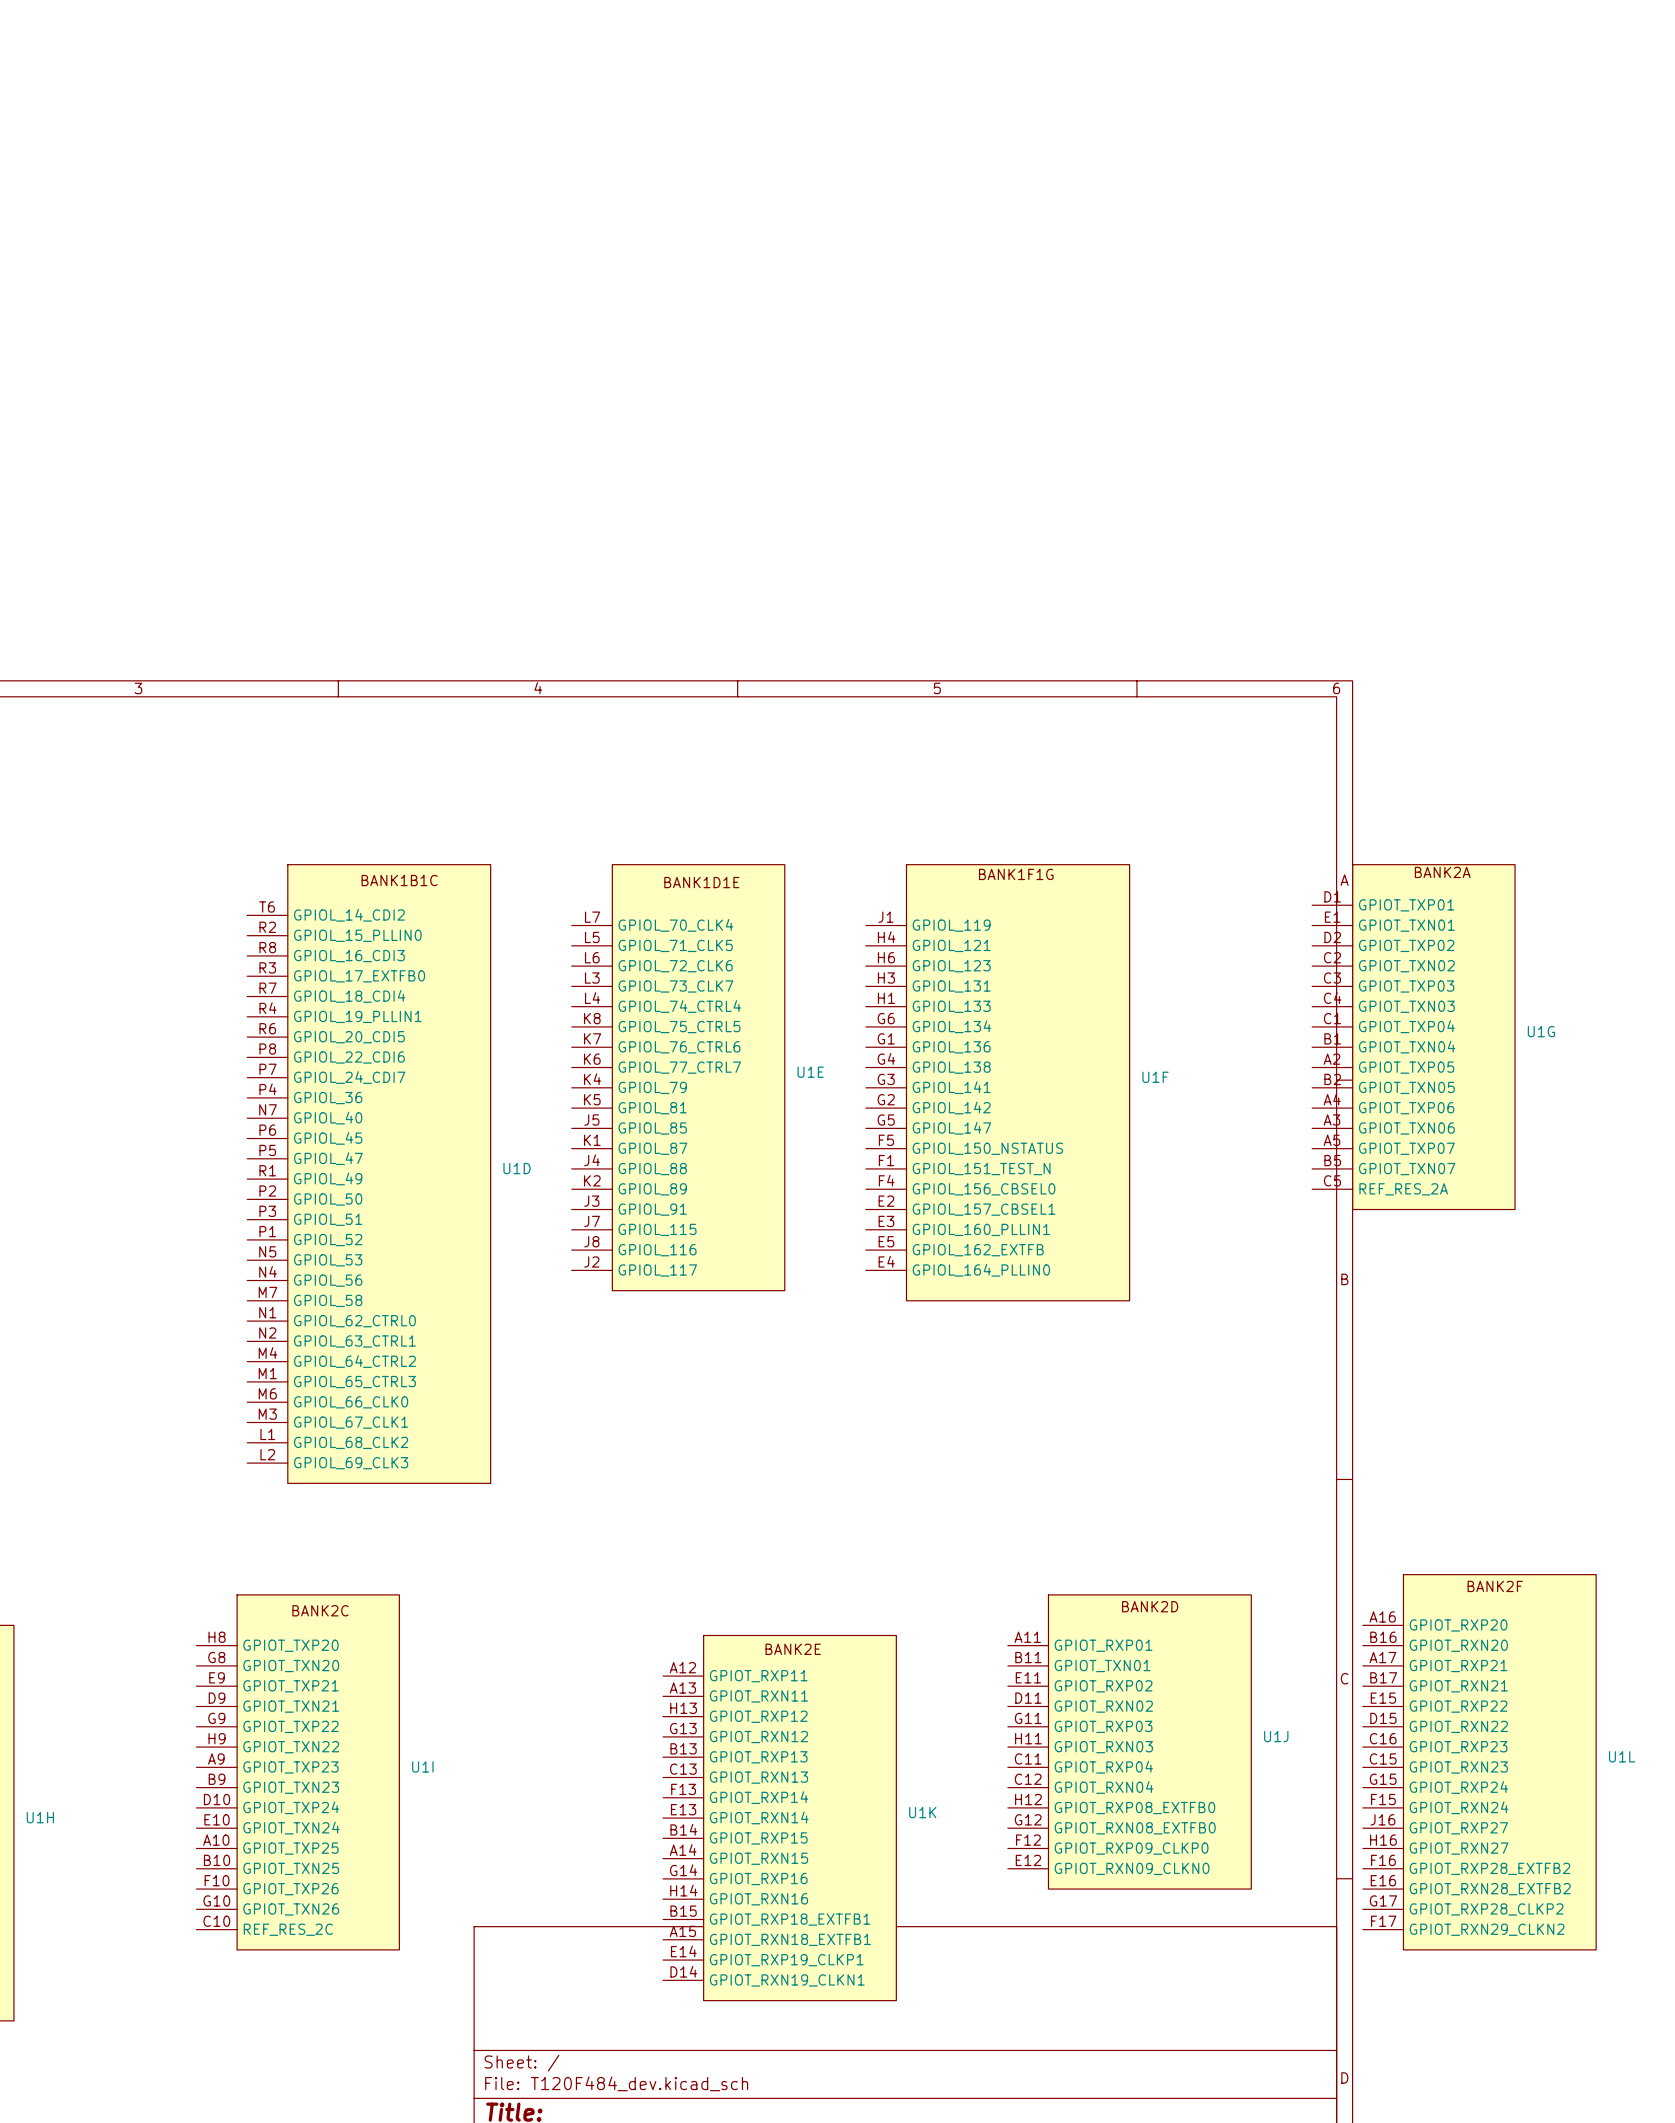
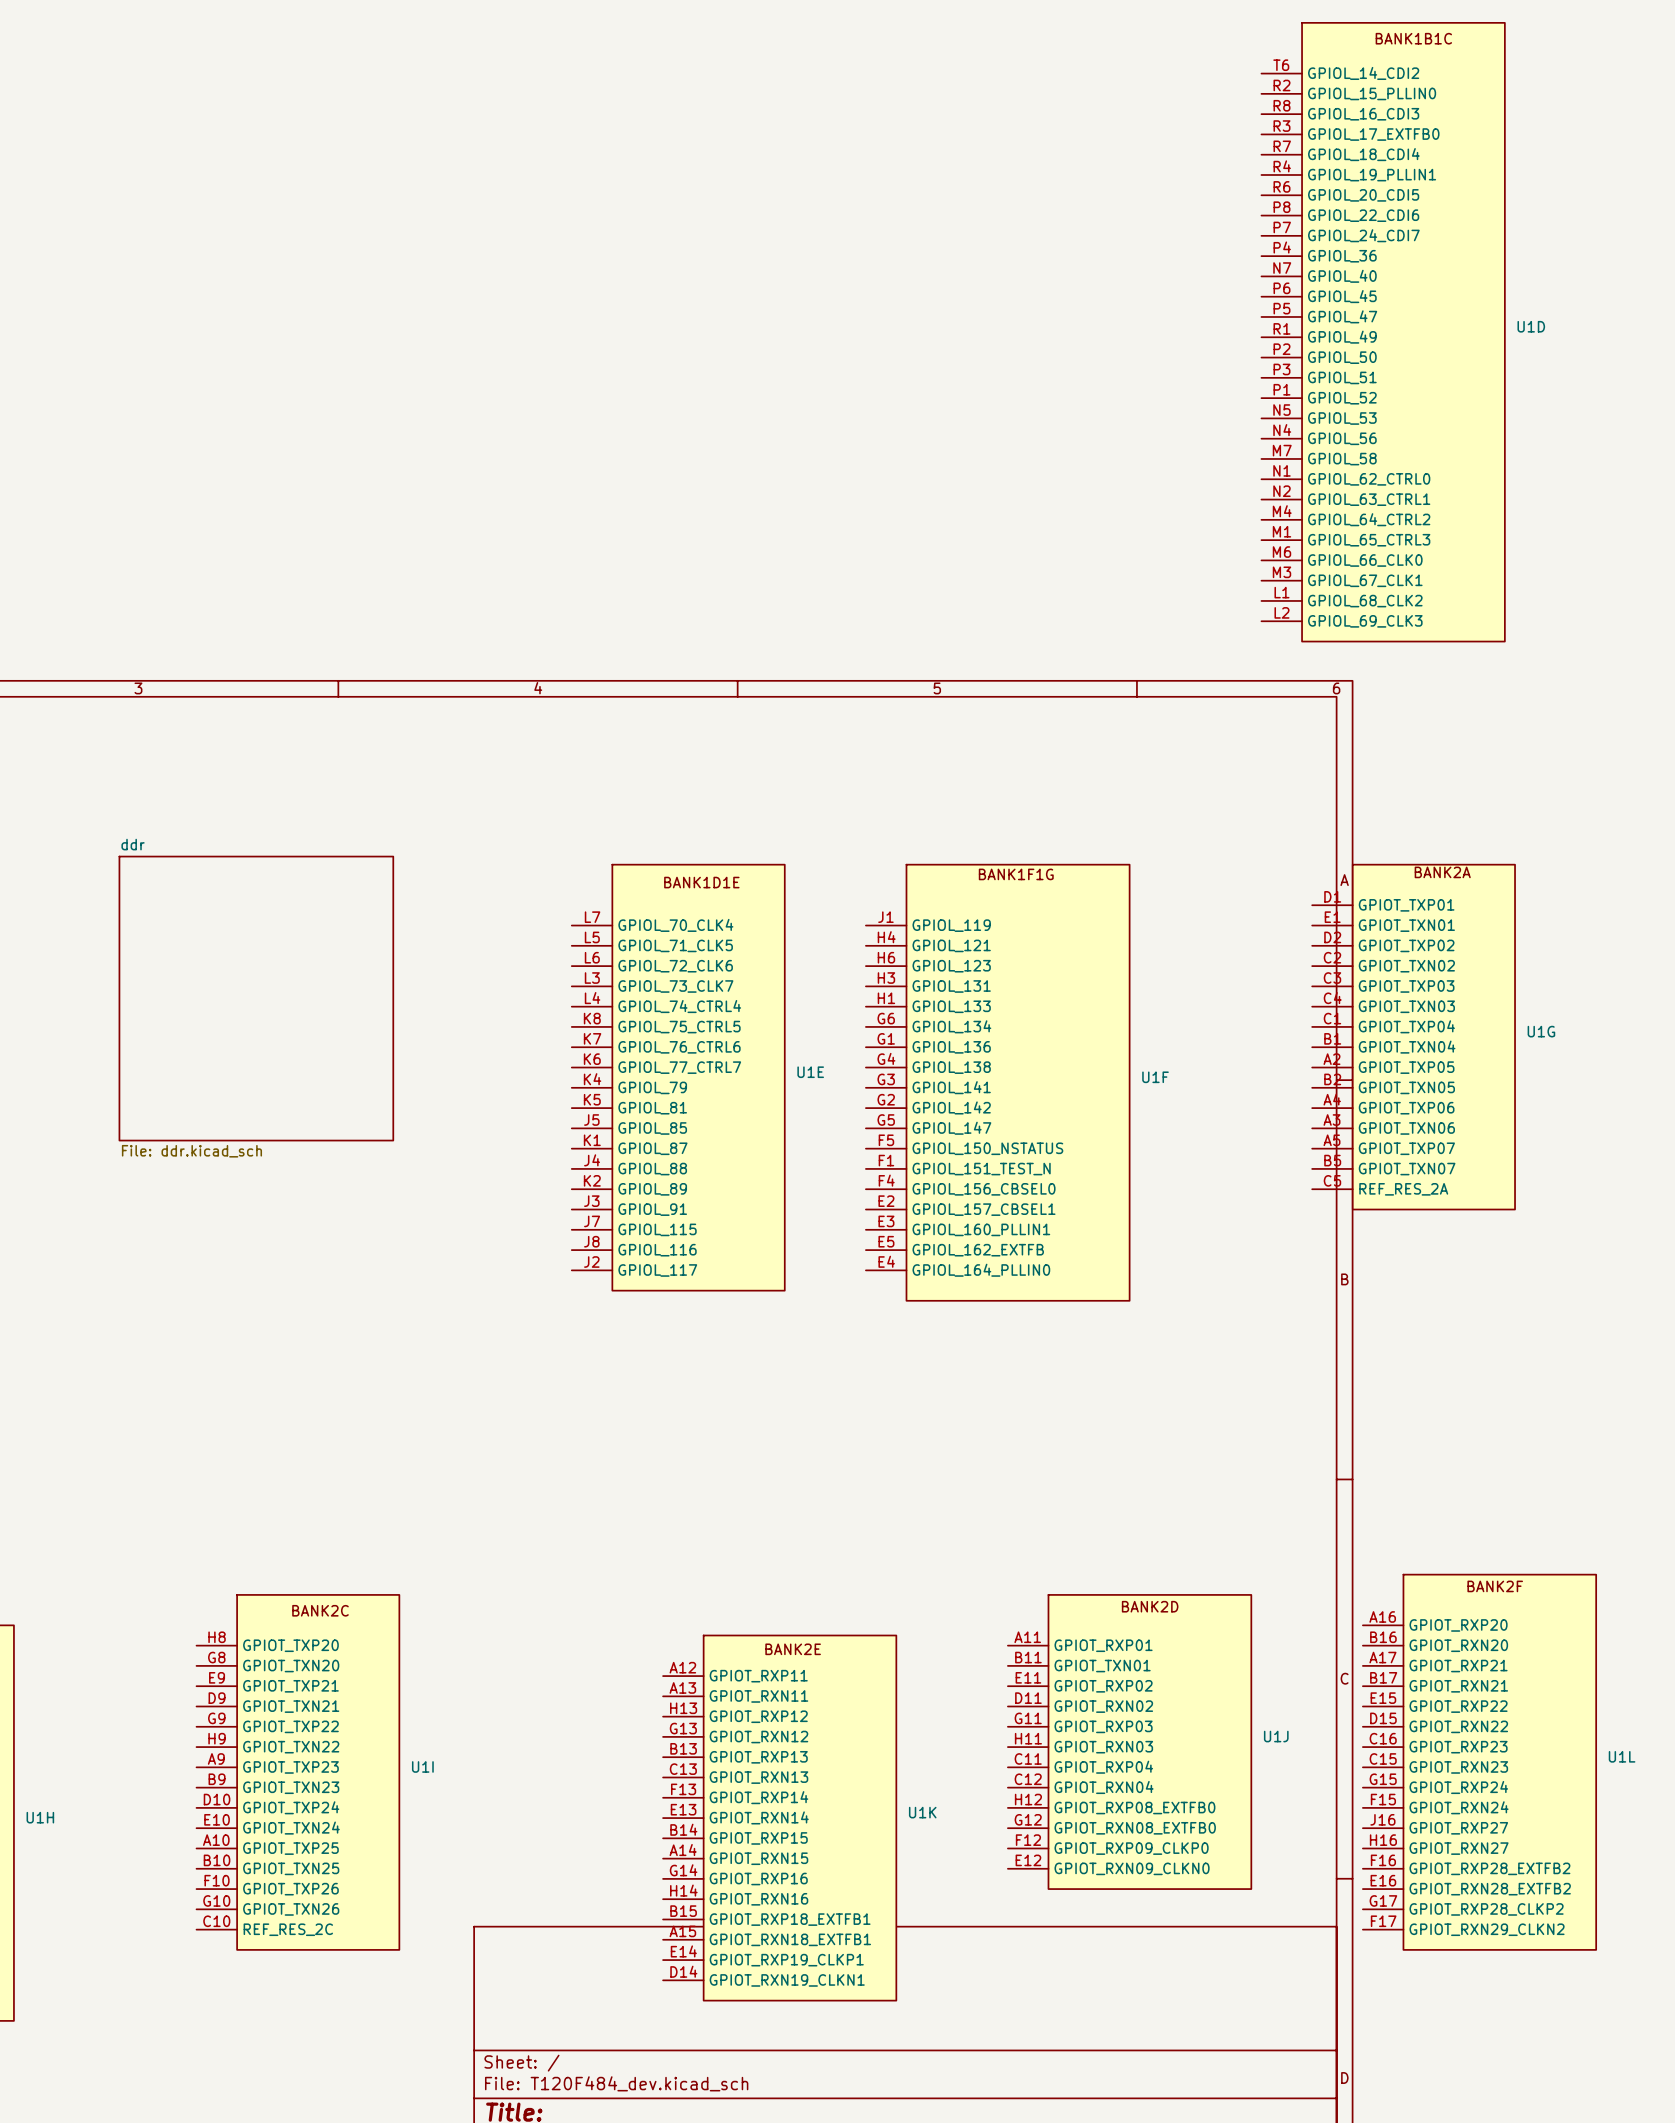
sheet ddr: none -> File: ddr.kicad_sch (256, 998)
U1D position: (368, 1174) -> (1383, 332)

